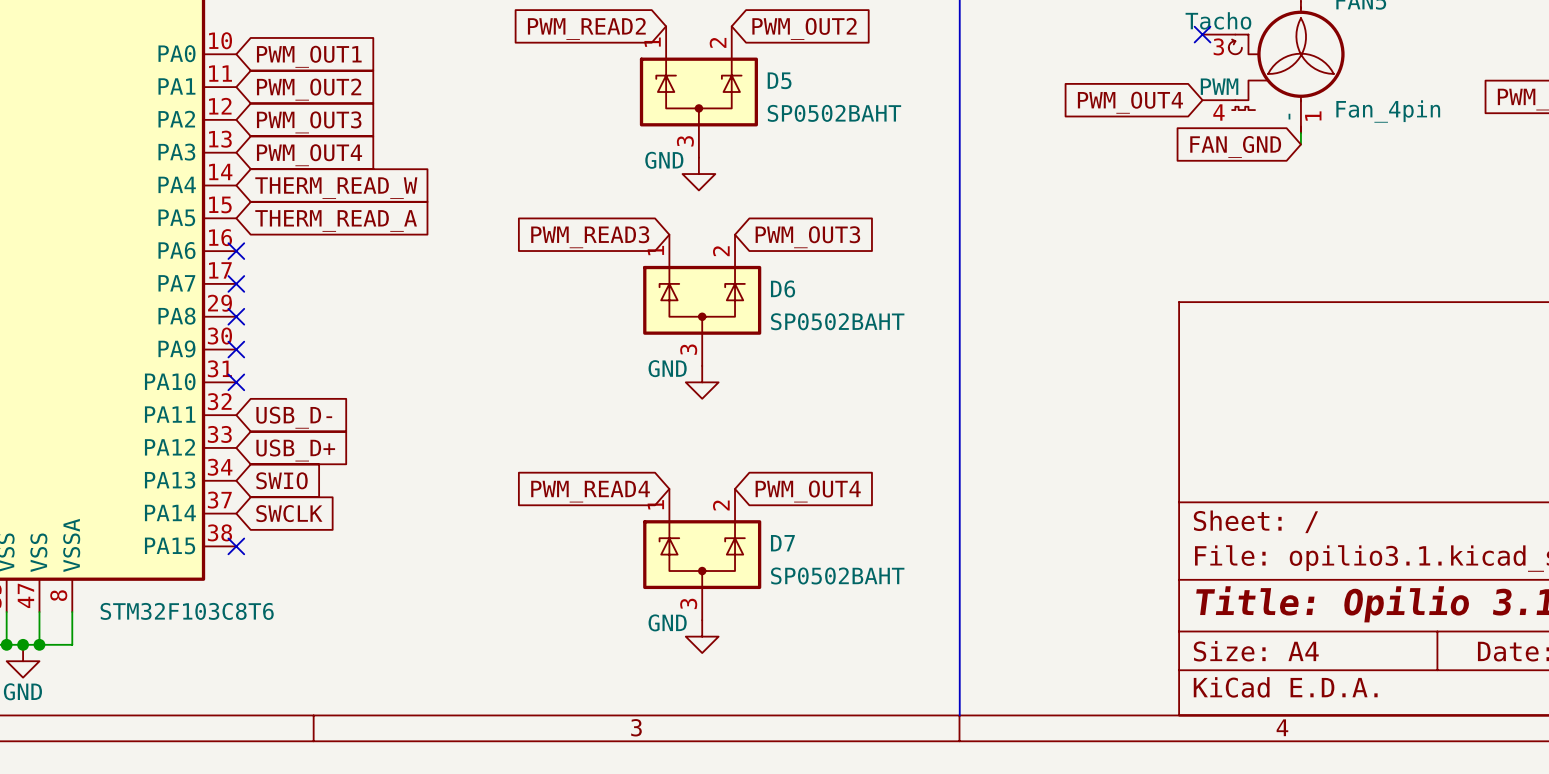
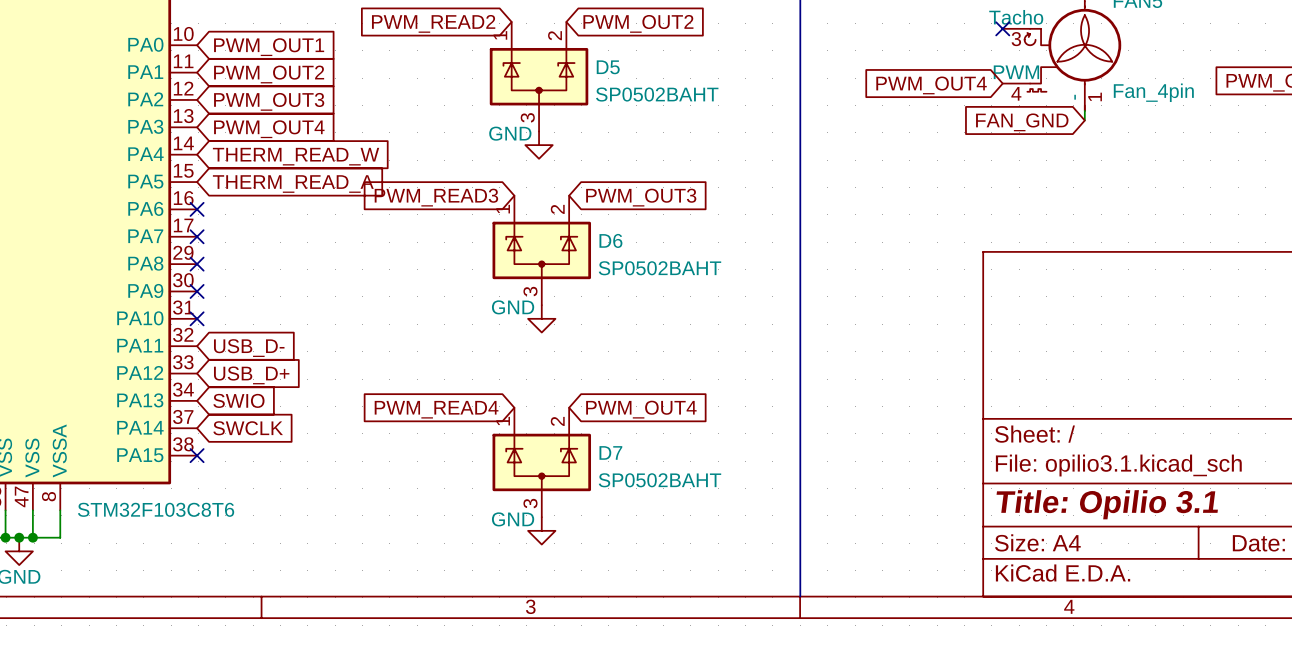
global label position: PWM_READ2 (586, 28) -> PWM_READ2 (433, 23)
global label position: PWM_OUT2 (804, 28) -> PWM_OUT2 (638, 23)
D5 position: (698, 92) -> (539, 76)
power symbol position: GND (698, 174) -> GND (539, 145)
global label position: PWM_READ3 (590, 237) -> PWM_READ3 (436, 197)
global label position: PWM_OUT3 (807, 237) -> PWM_OUT3 (641, 197)
D6 position: (702, 300) -> (541, 250)
power symbol position: GND (702, 382) -> GND (541, 318)
global label position: PWM_READ4 (590, 491) -> PWM_READ4 (436, 409)
global label position: PWM_OUT4 (808, 491) -> PWM_OUT4 (641, 409)
D7 position: (702, 554) -> (541, 462)
power symbol position: GND (702, 636) -> GND (541, 530)

